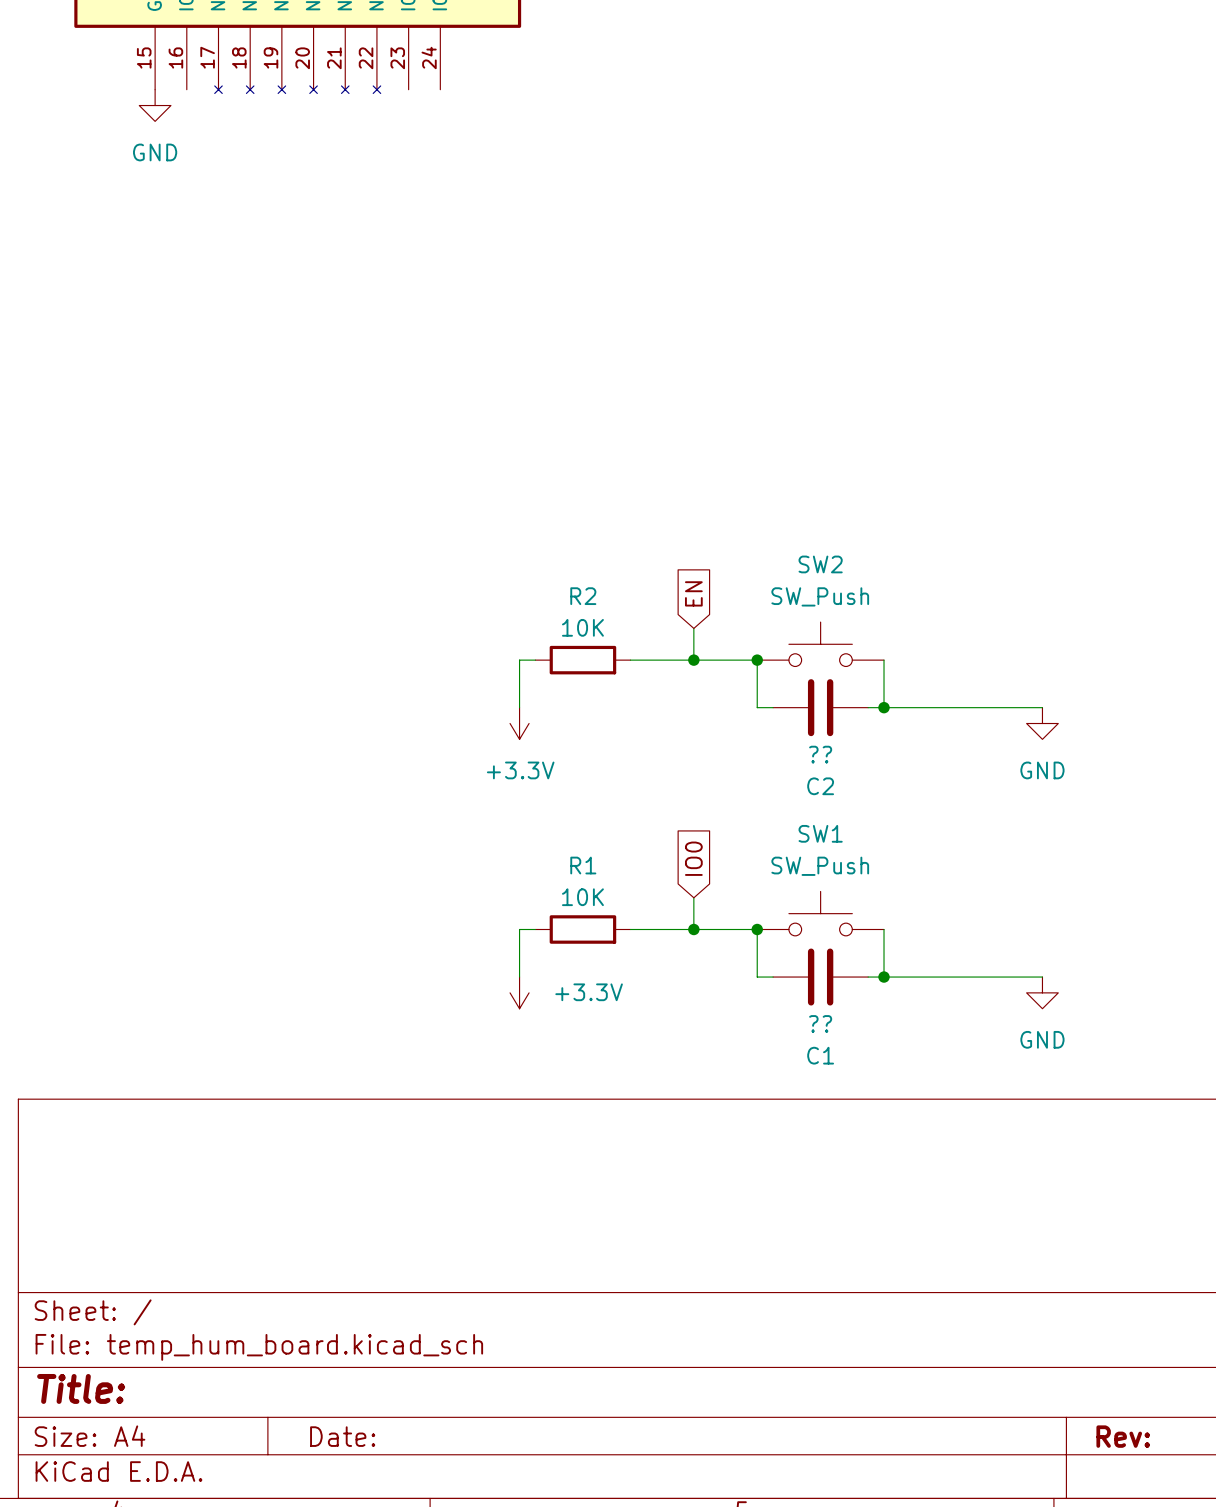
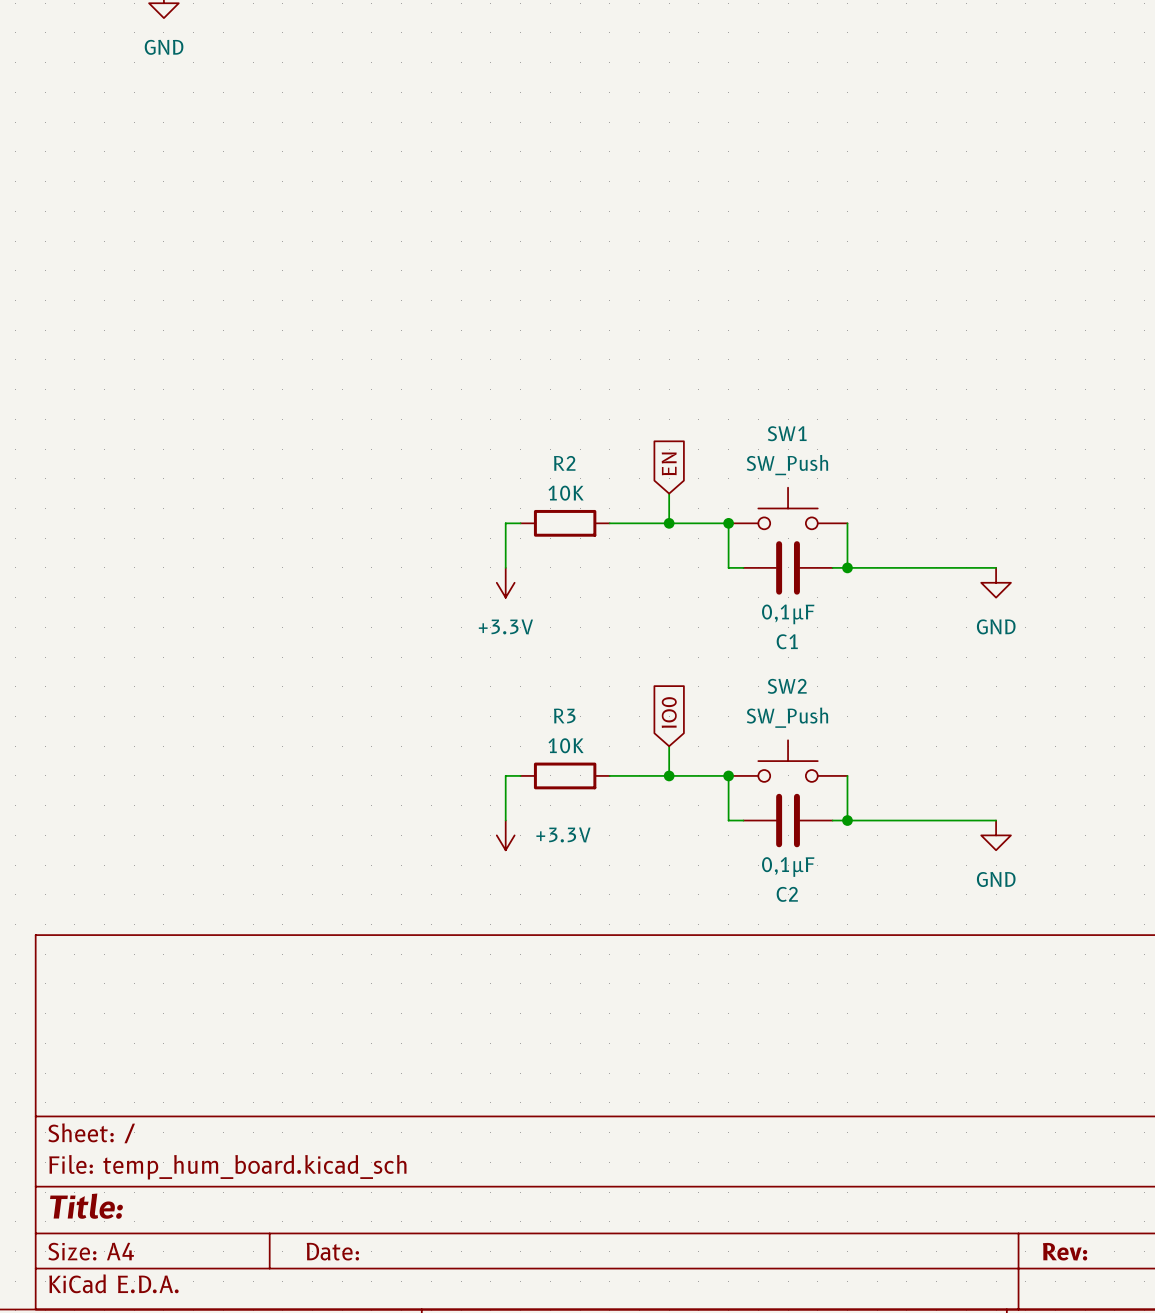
SW2 name: SW2 (820, 564) -> SW1 (787, 433)
C2 value: ?? (820, 754) -> 0,1µF (788, 614)
C2 name: C2 (820, 786) -> C1 (787, 641)
SW1 name: SW1 (820, 833) -> SW2 (787, 686)
R1 name: R1 (583, 865) -> R3 (564, 716)
C1 value: ?? (820, 1023) -> 0,1µF (788, 867)
C1 name: C1 (820, 1055) -> C2 (787, 894)

